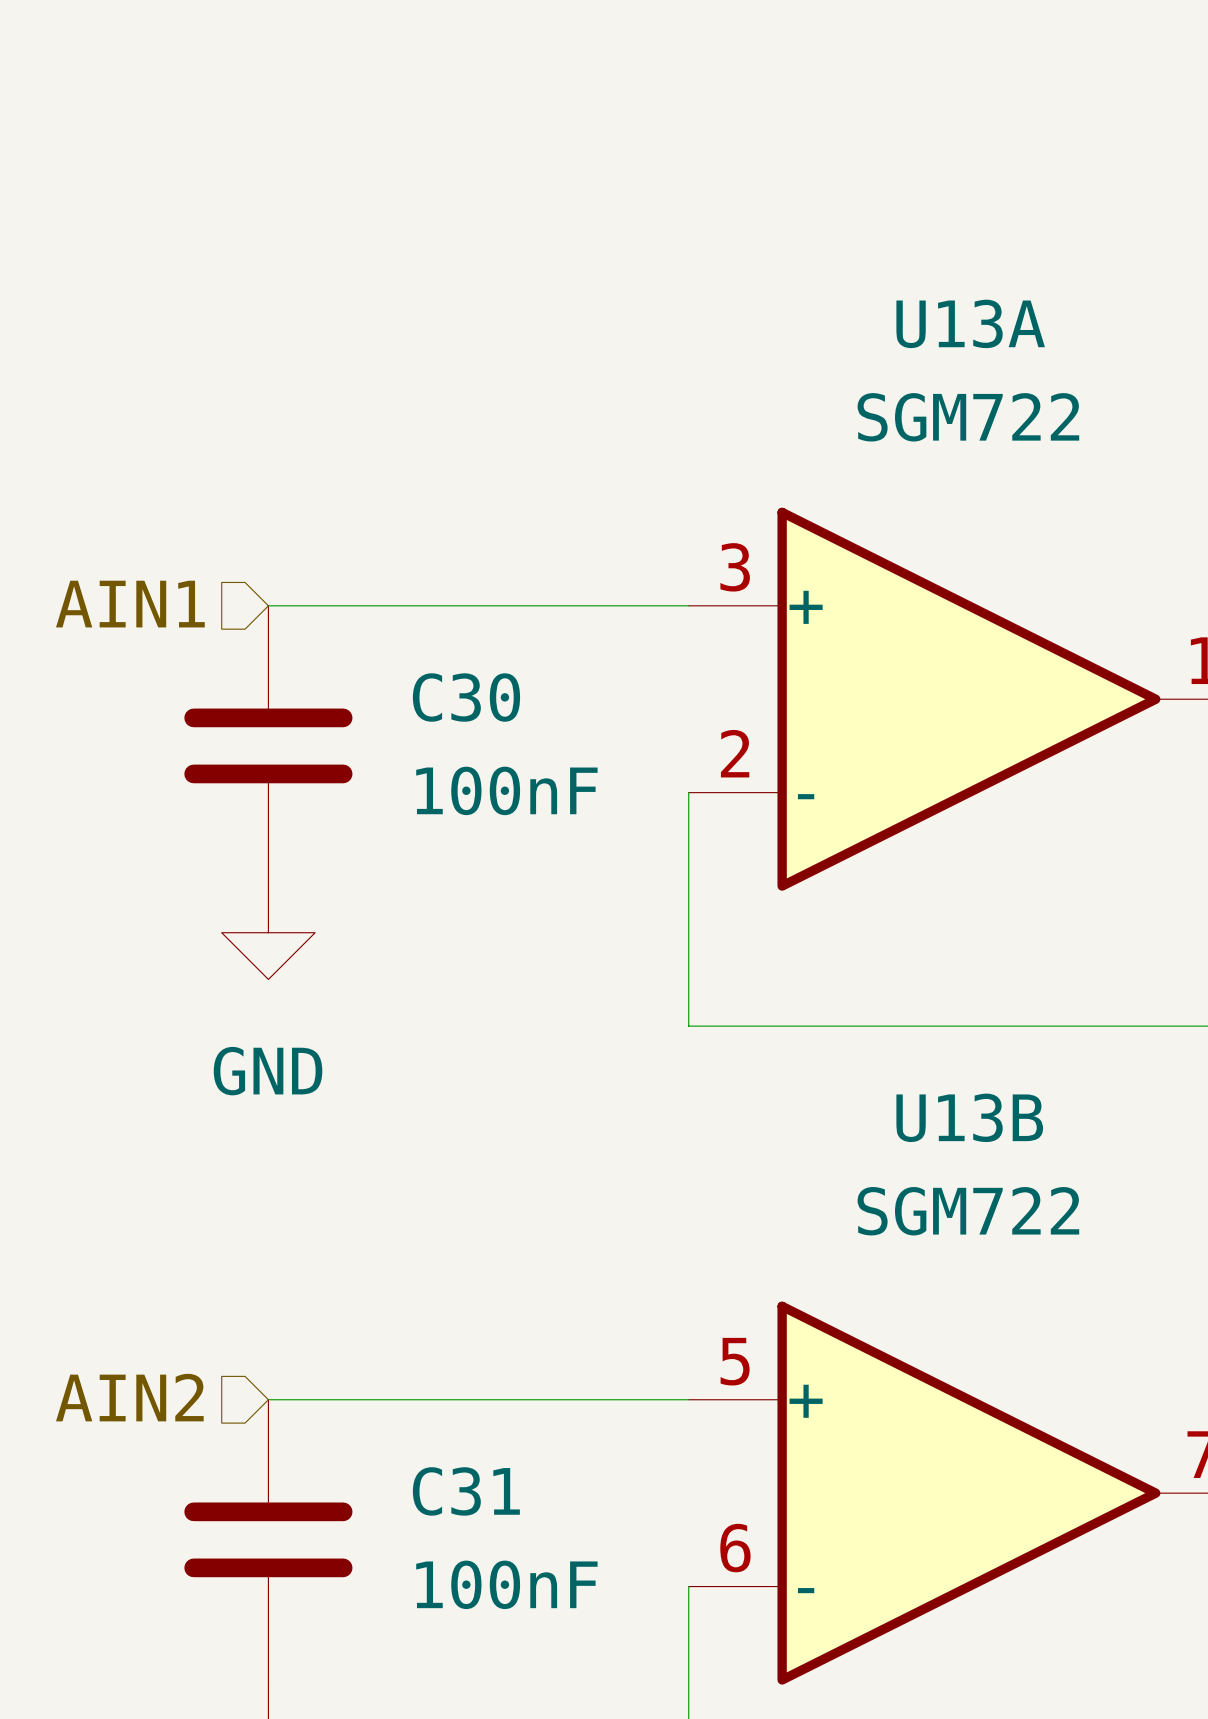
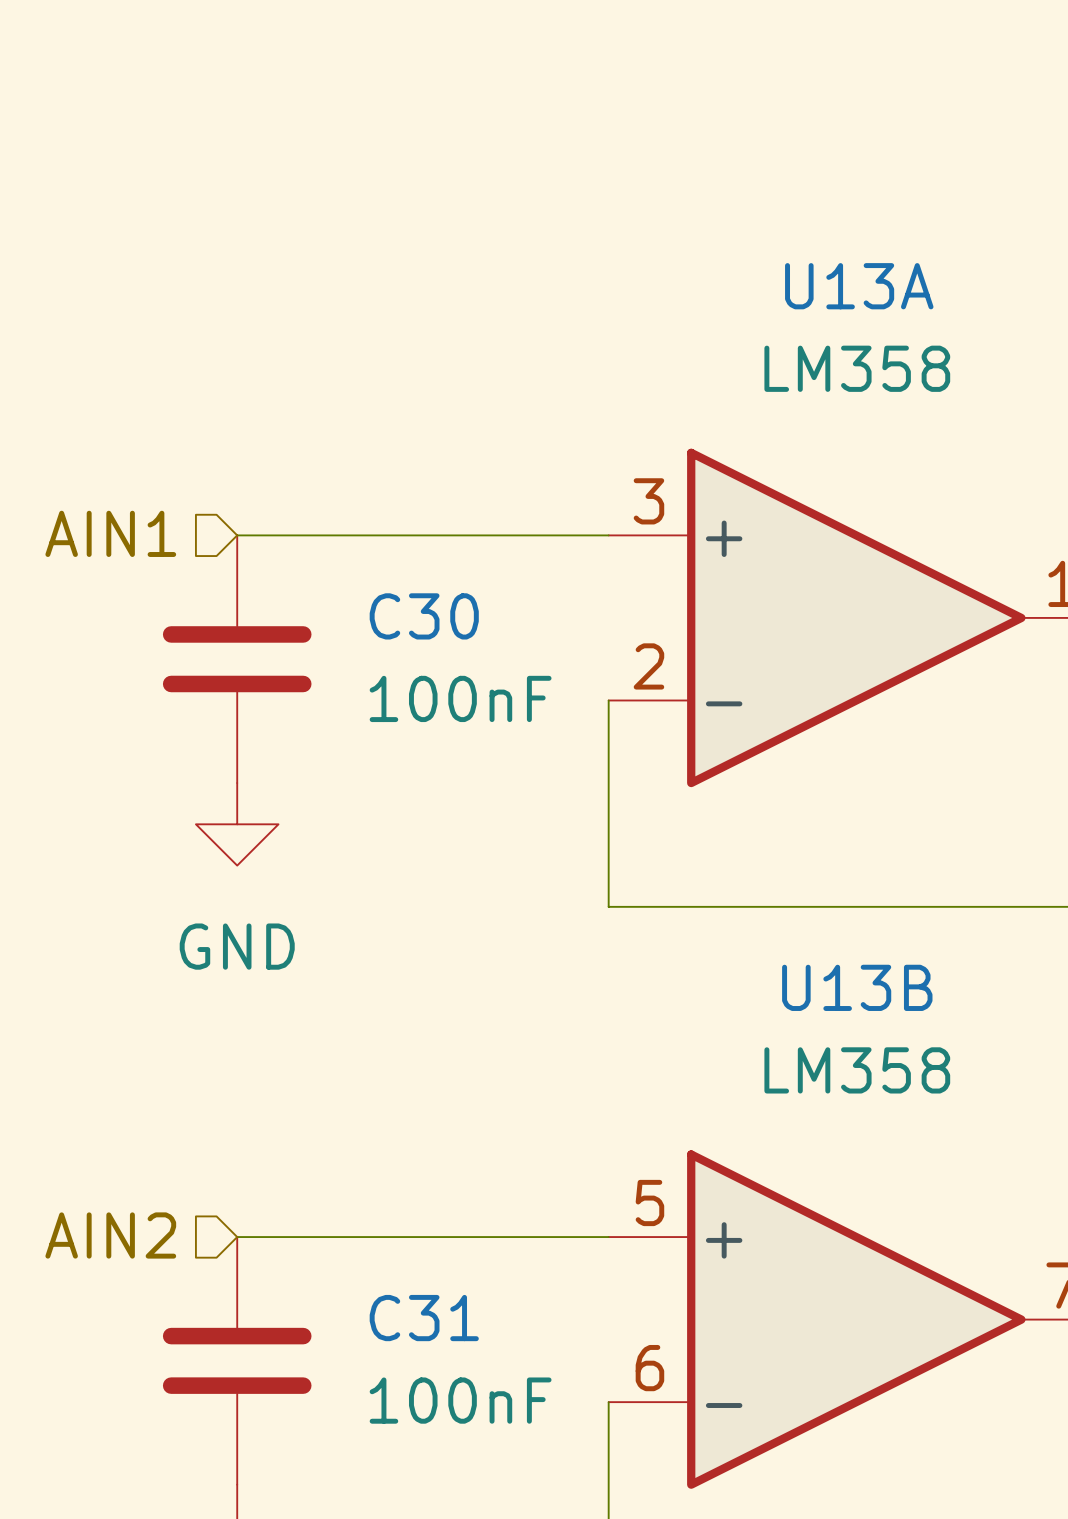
U13A value: SGM722 (968, 417) -> LM358 (857, 368)
U13B value: SGM722 (968, 1211) -> LM358 (857, 1070)

